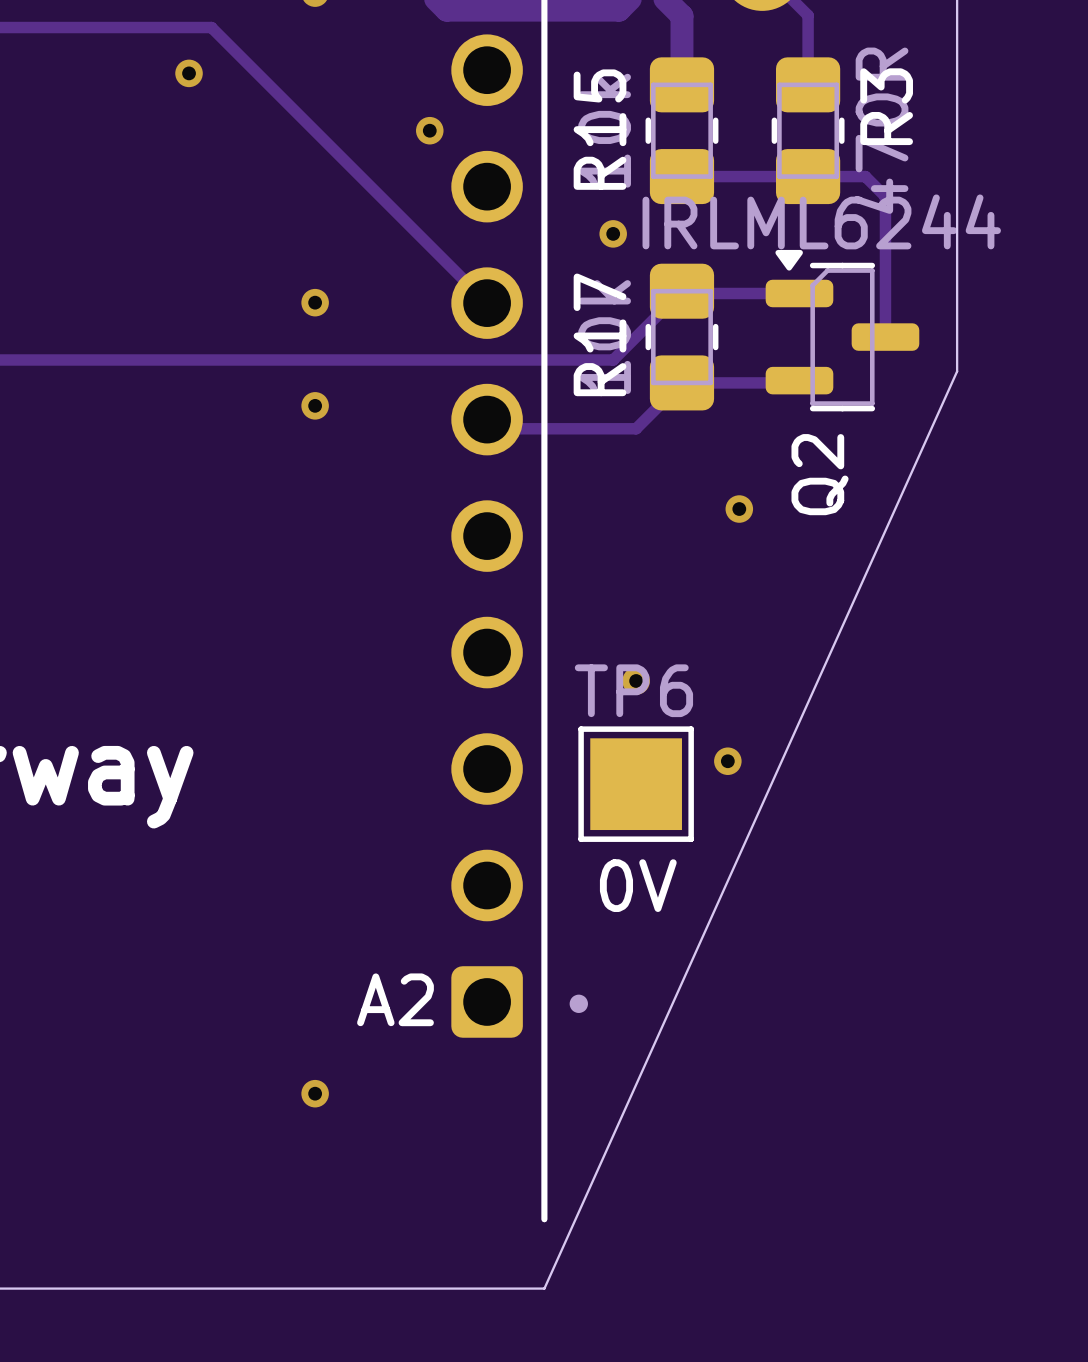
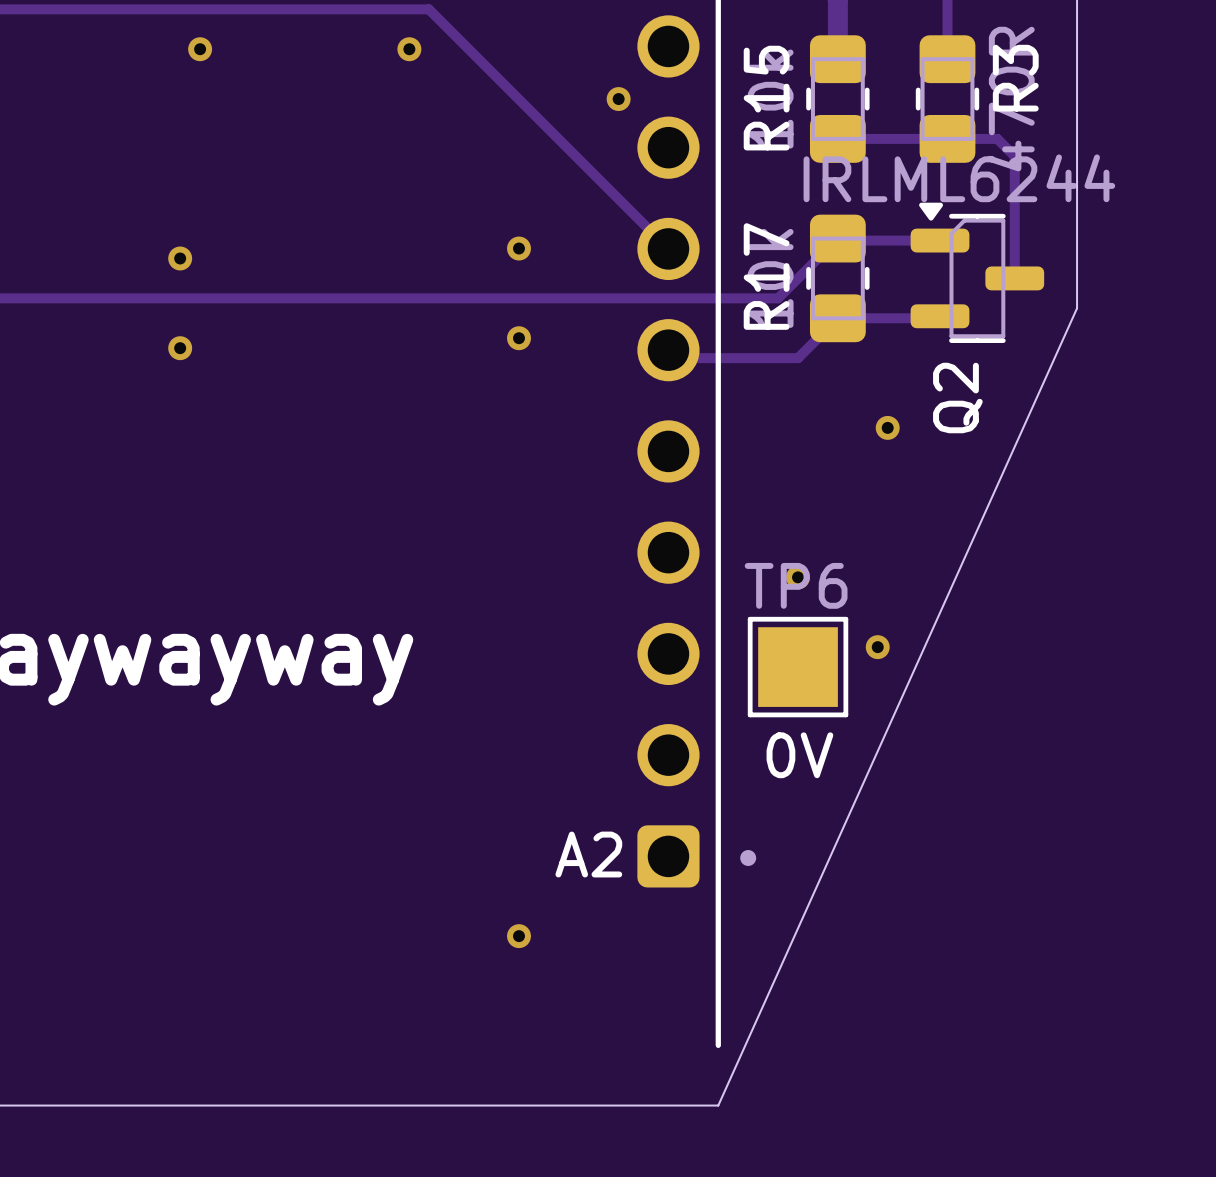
via: (613, 233) -> none

